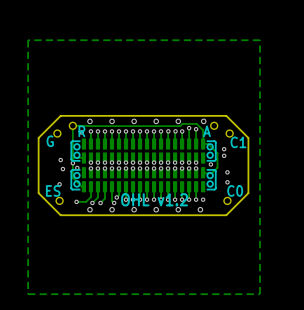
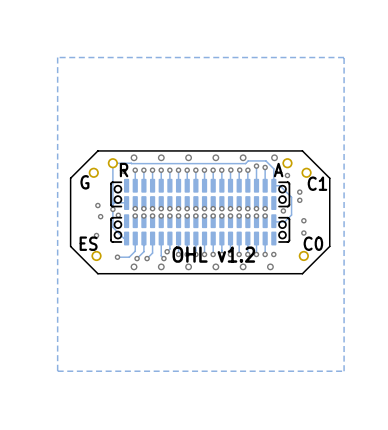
via: none -> (287, 175)

